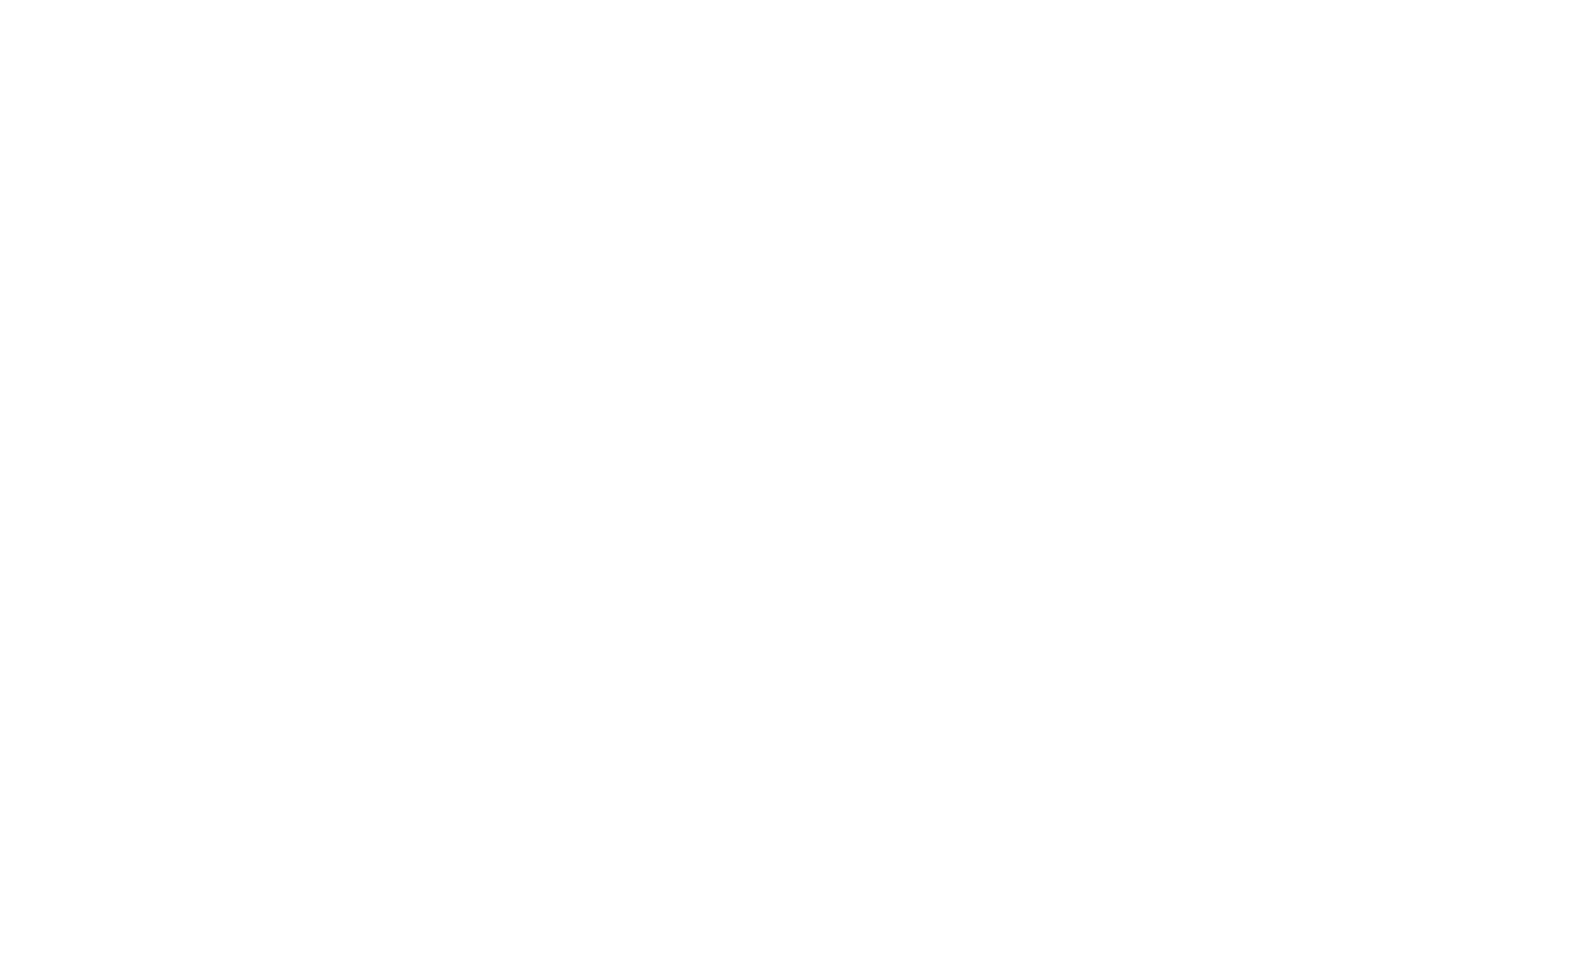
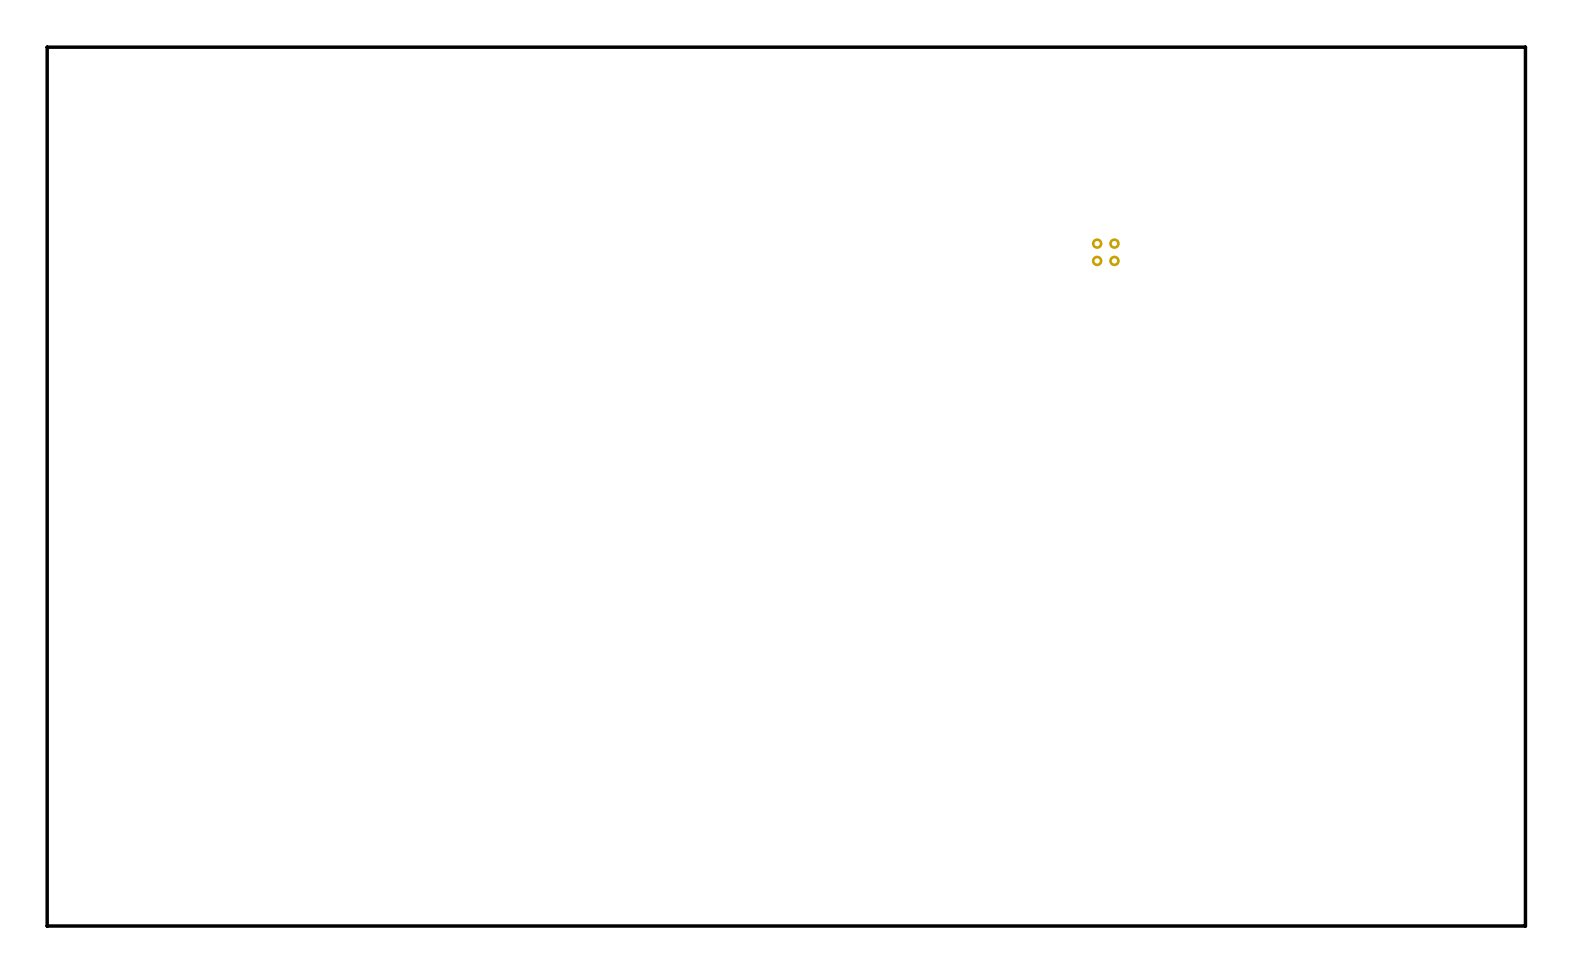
board edge: none -> (1525, 47) (47, 47) (47, 926) (1525, 926) (1525, 47)
part: none -> (1105, 252)

